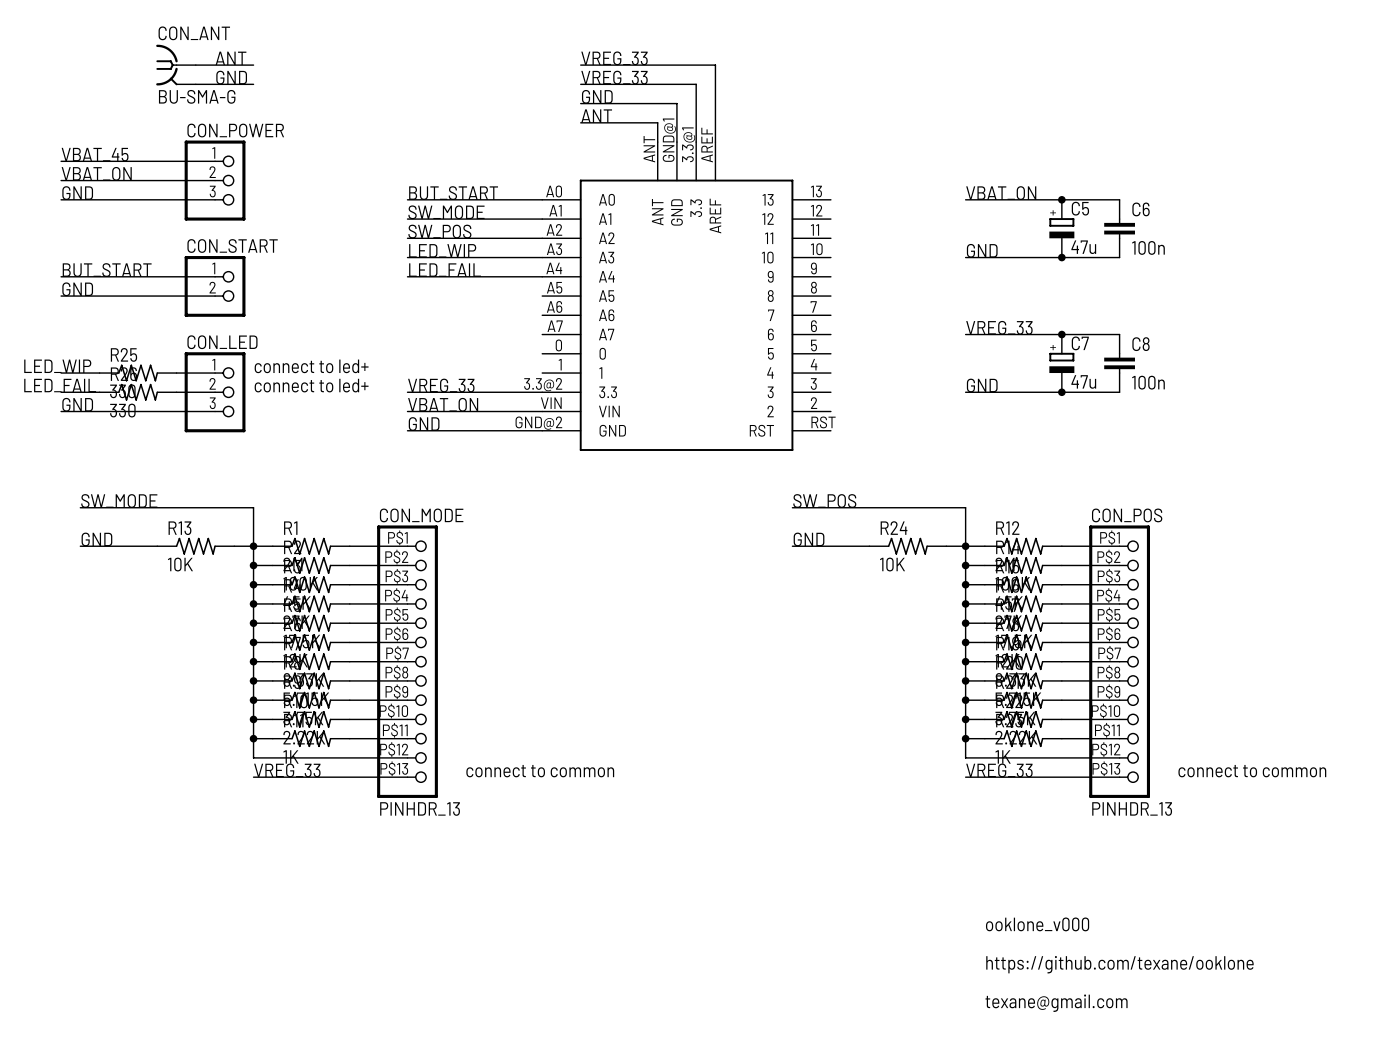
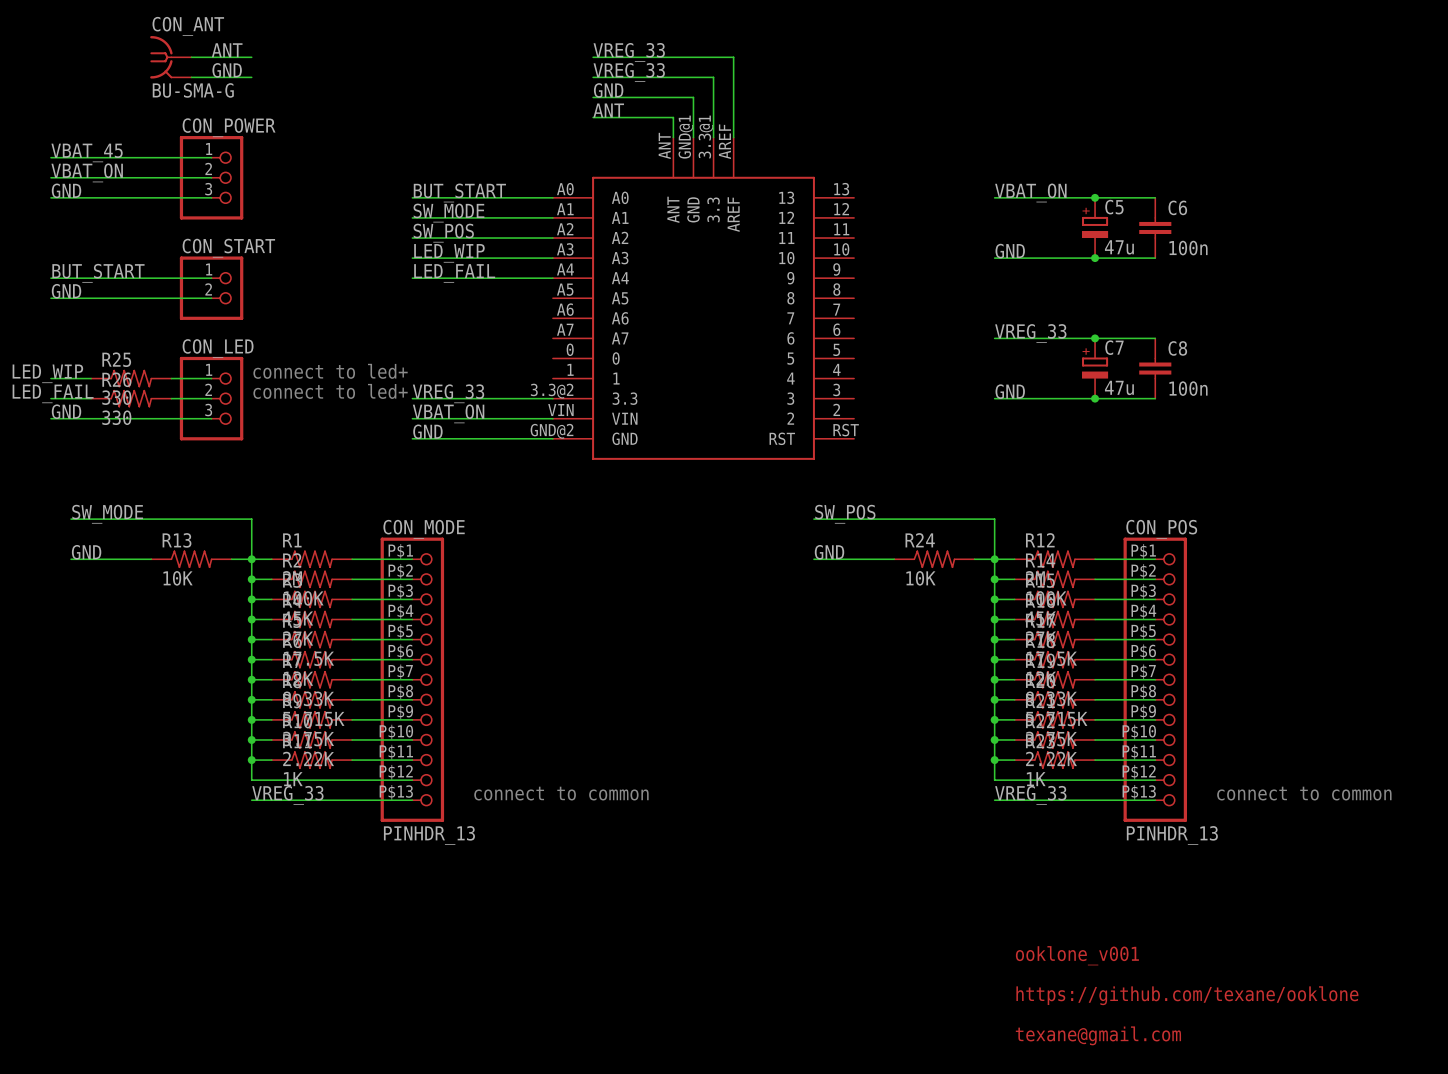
text: ooklone_v000 (1037, 924) -> ooklone_v001 (1077, 955)

